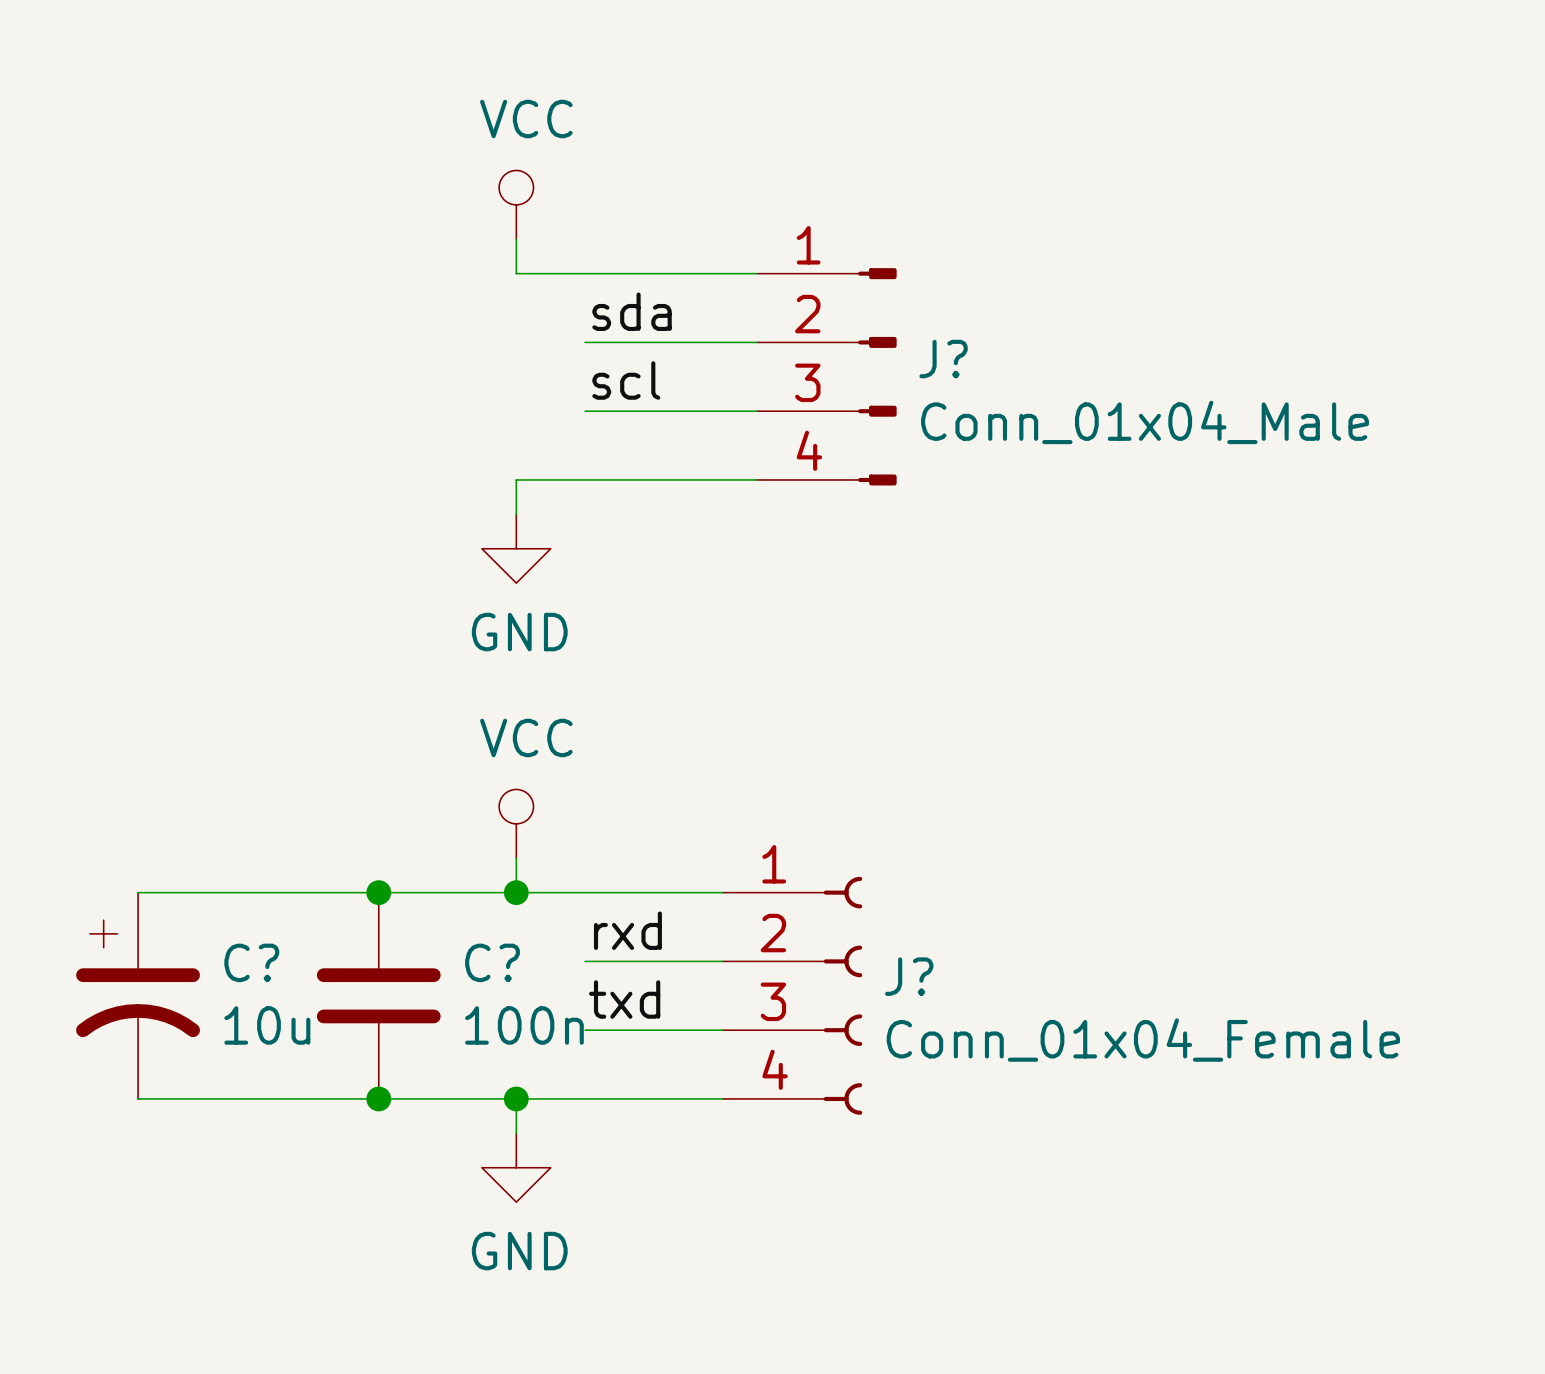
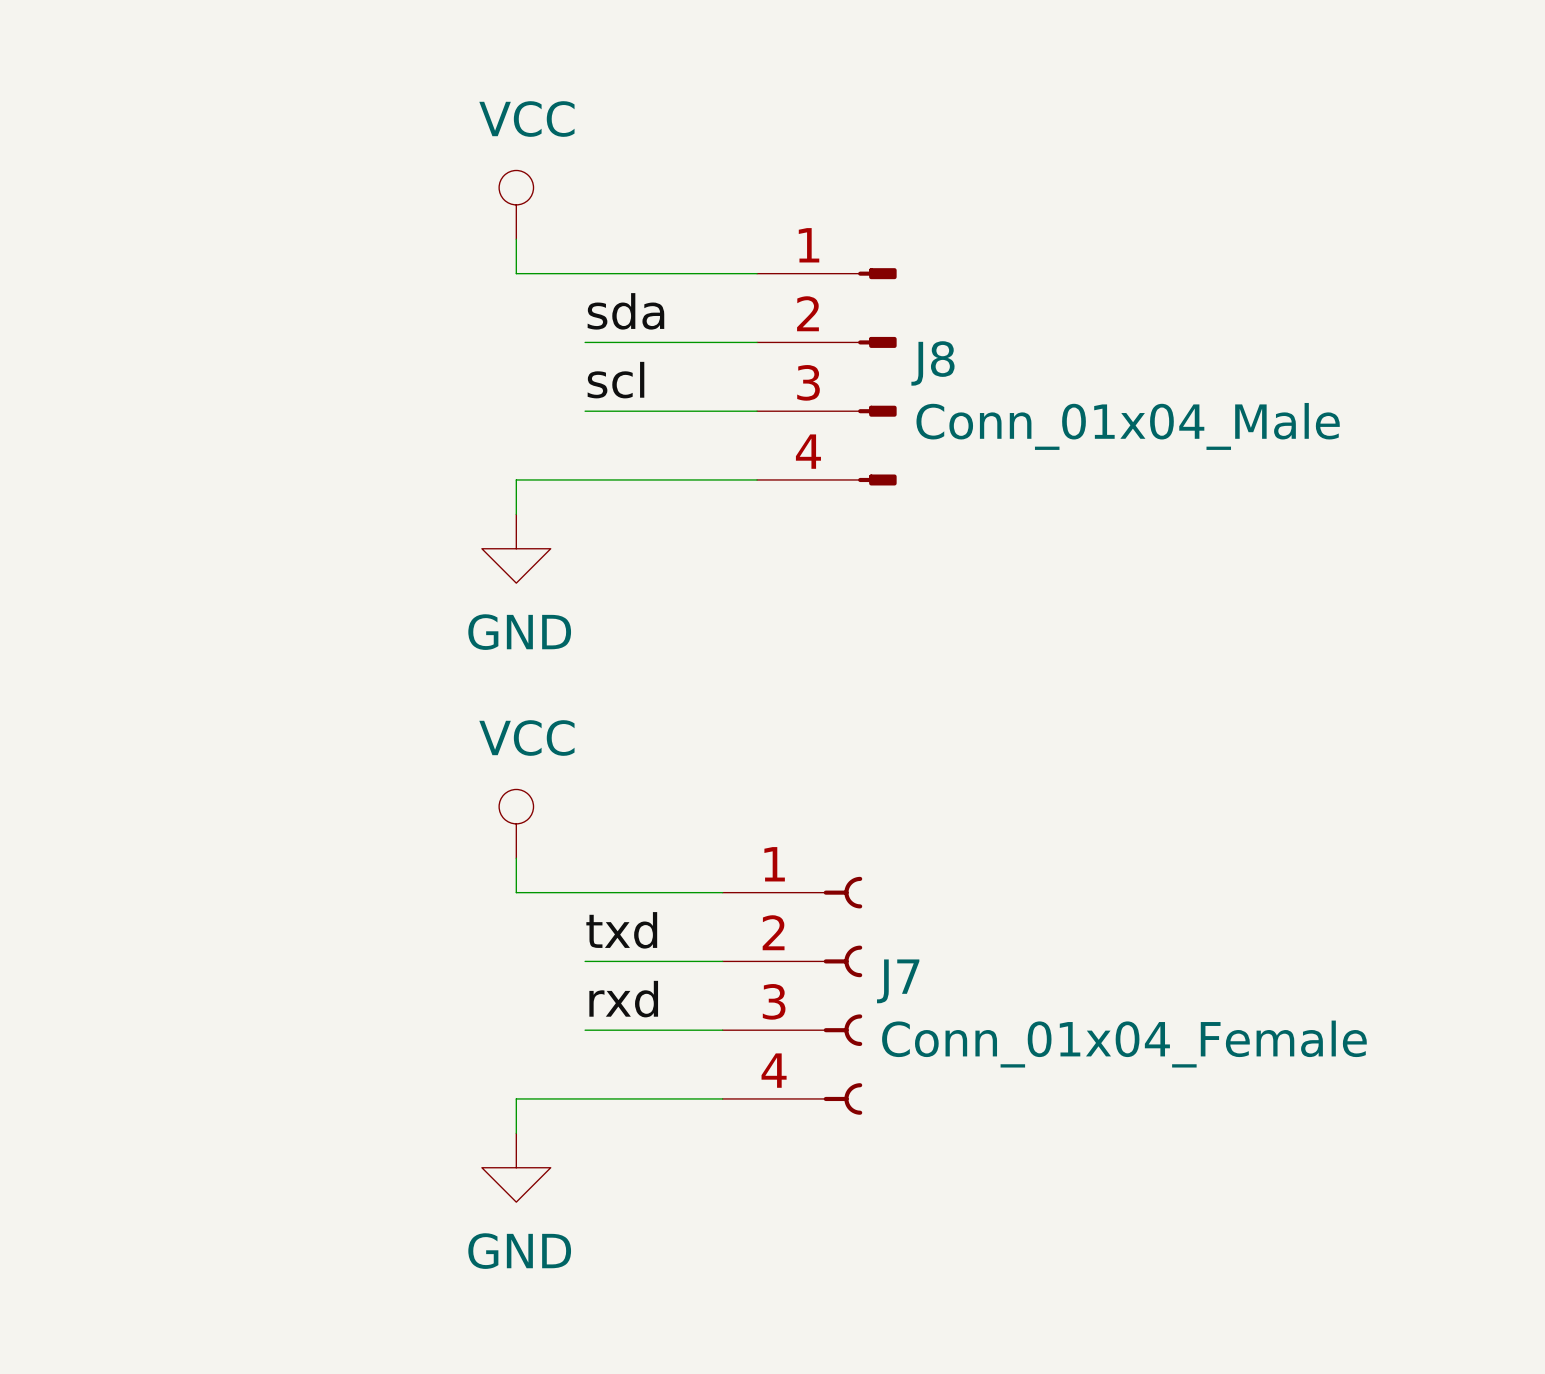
J? name: J? (943, 359) -> J8 (932, 363)
wire: (138, 892) (516, 892) -> none
junction: (378, 892) -> none
junction: (516, 892) -> none
label: rxd (627, 930) -> txd (621, 930)
J? name: J? (909, 976) -> J7 (898, 981)
C?: 10u (138, 995) -> none
C?: 100n (378, 995) -> none
label: txd (624, 999) -> rxd (623, 999)
wire: (138, 1098) (516, 1098) -> none
junction: (378, 1098) -> none
junction: (516, 1098) -> none

